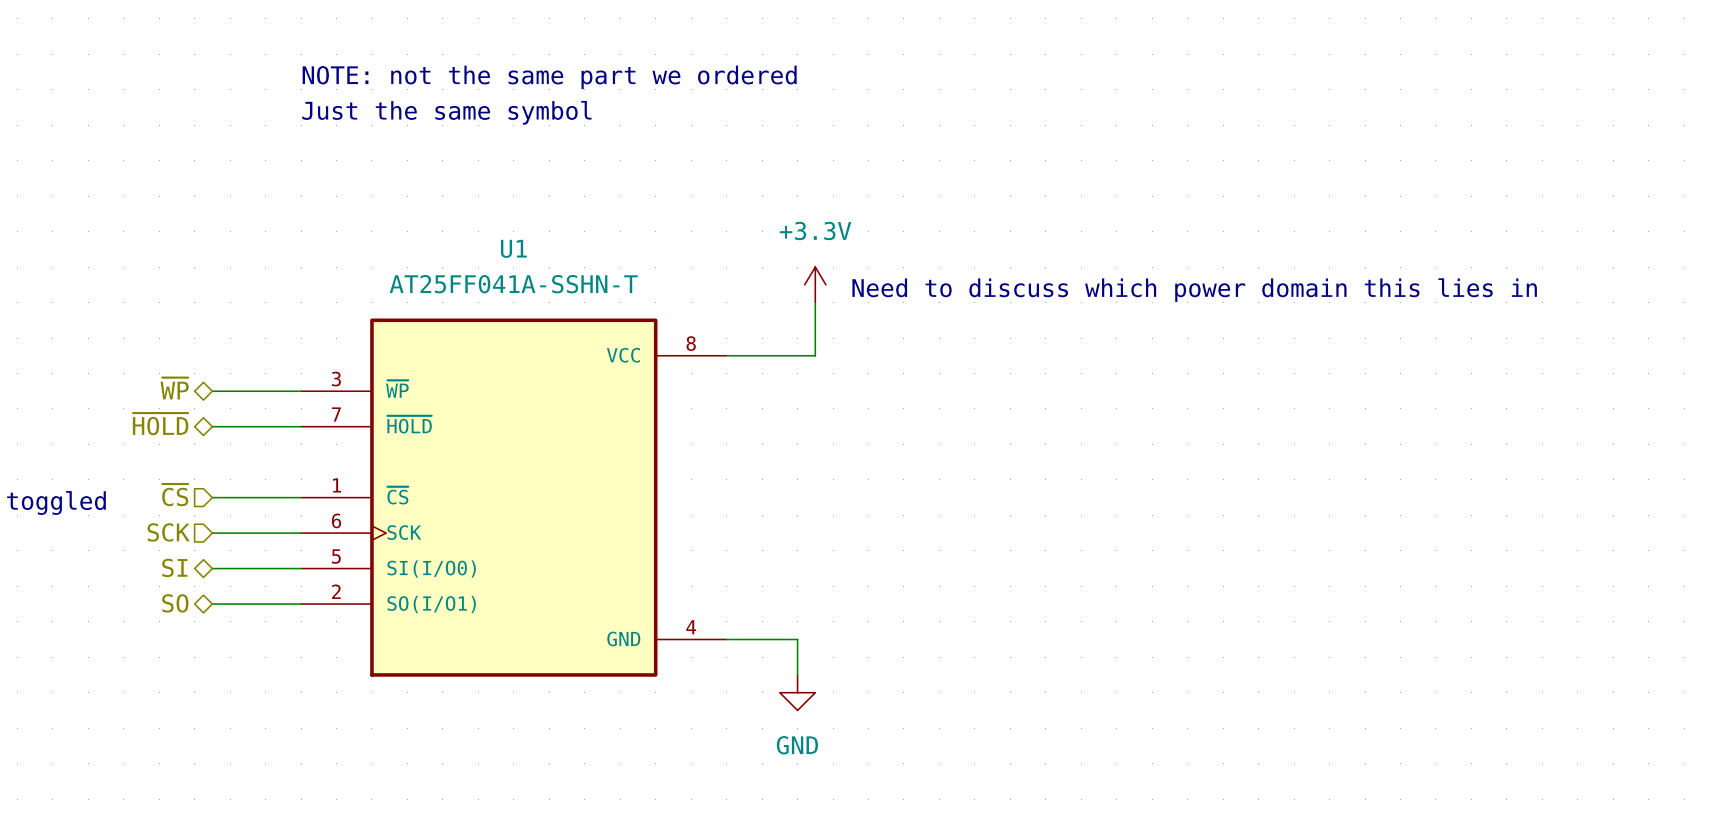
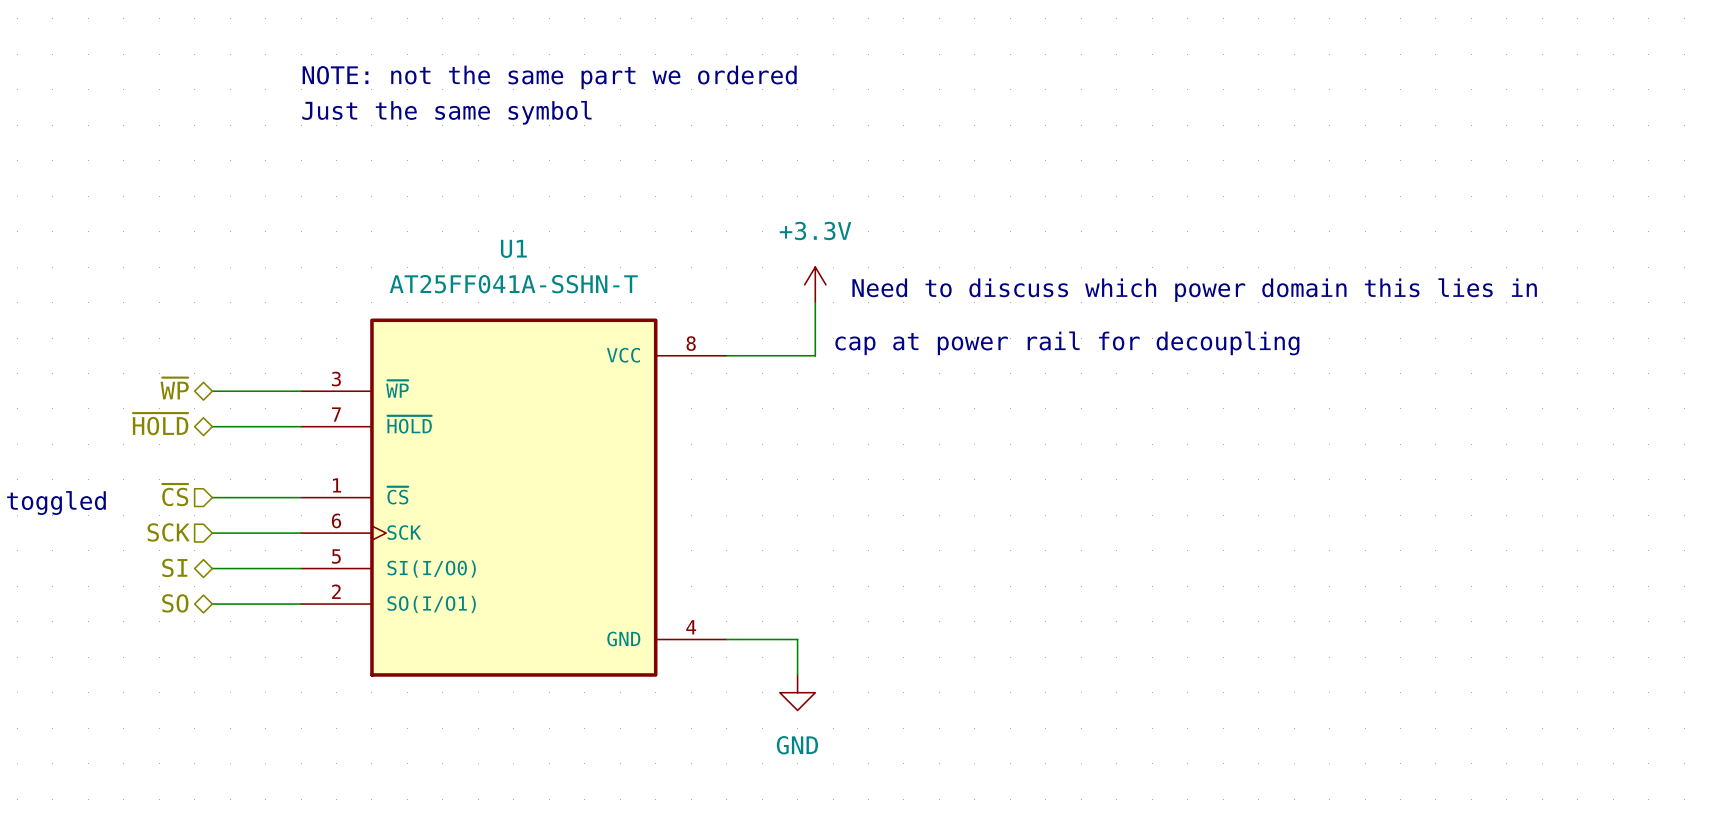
text: none -> cap at power rail for decoupling (1067, 343)

